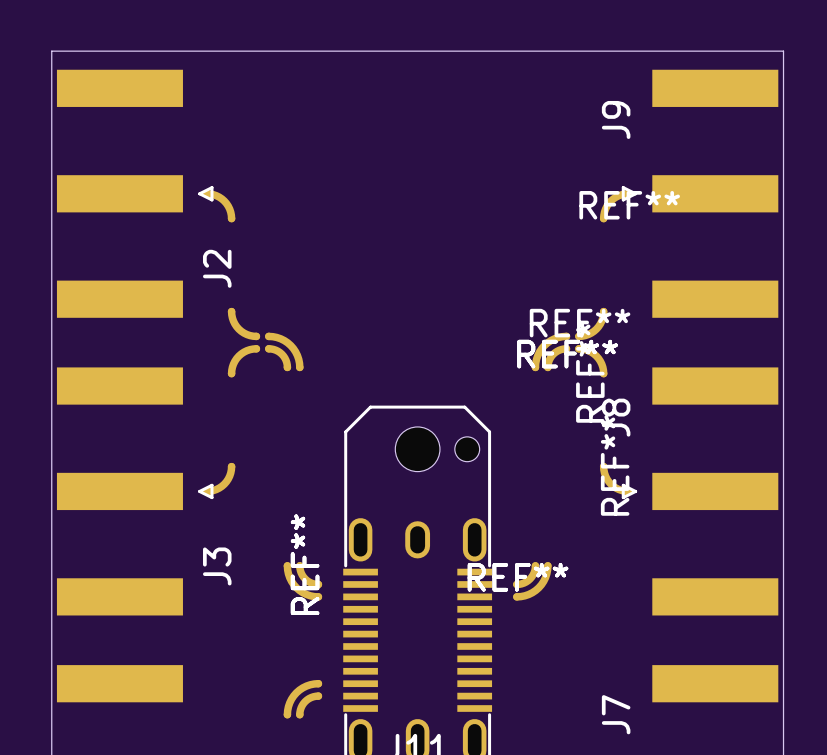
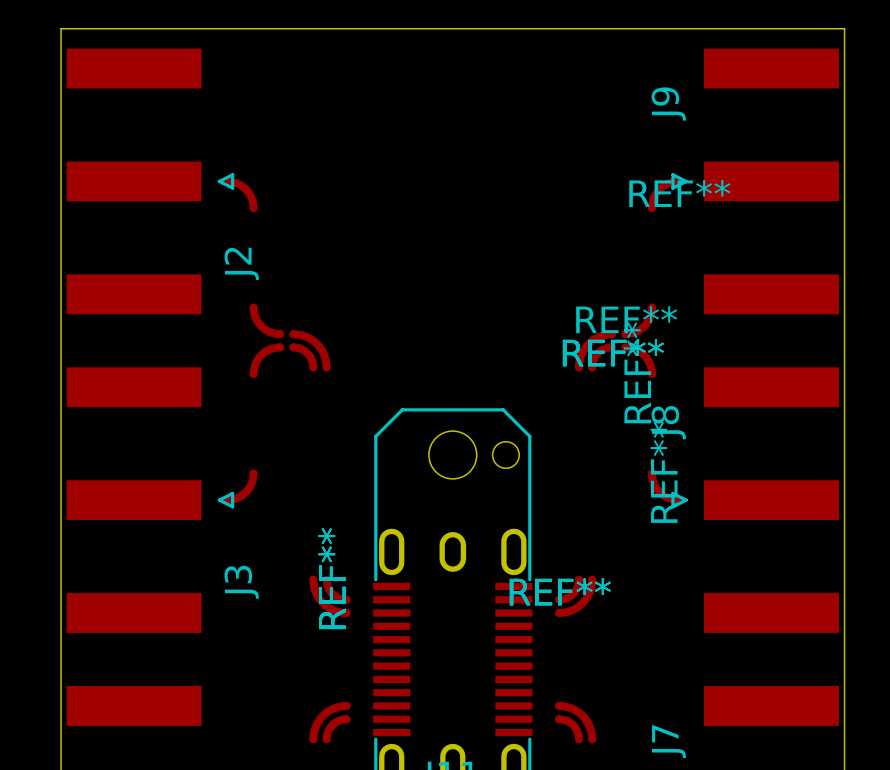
part: none -> (575, 722)
part: none -> (569, 729)

